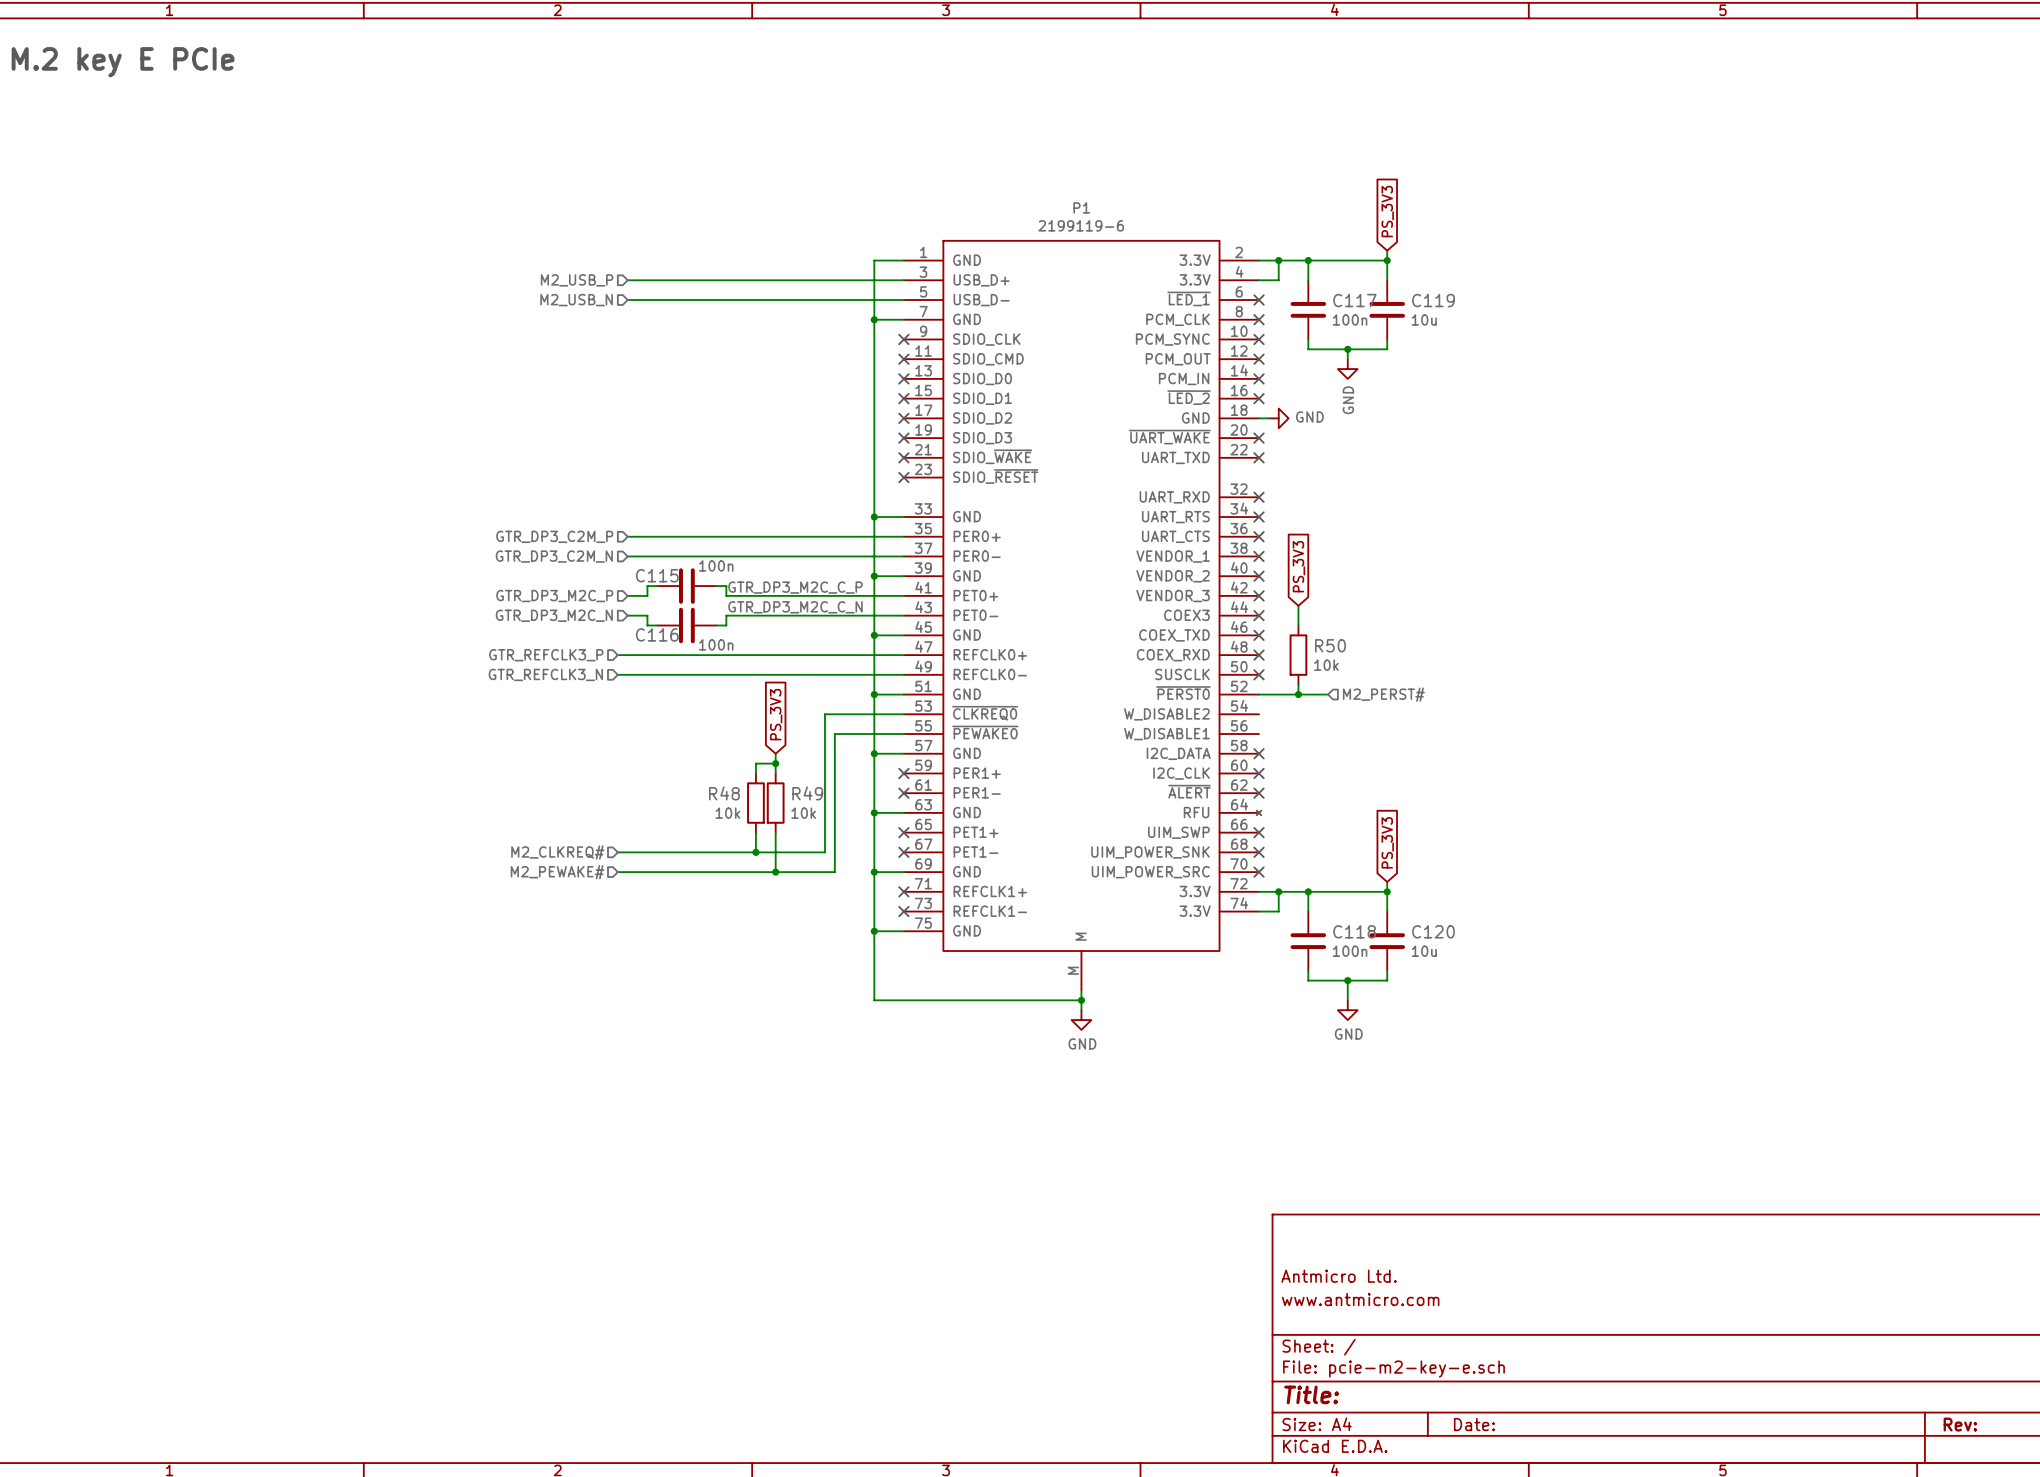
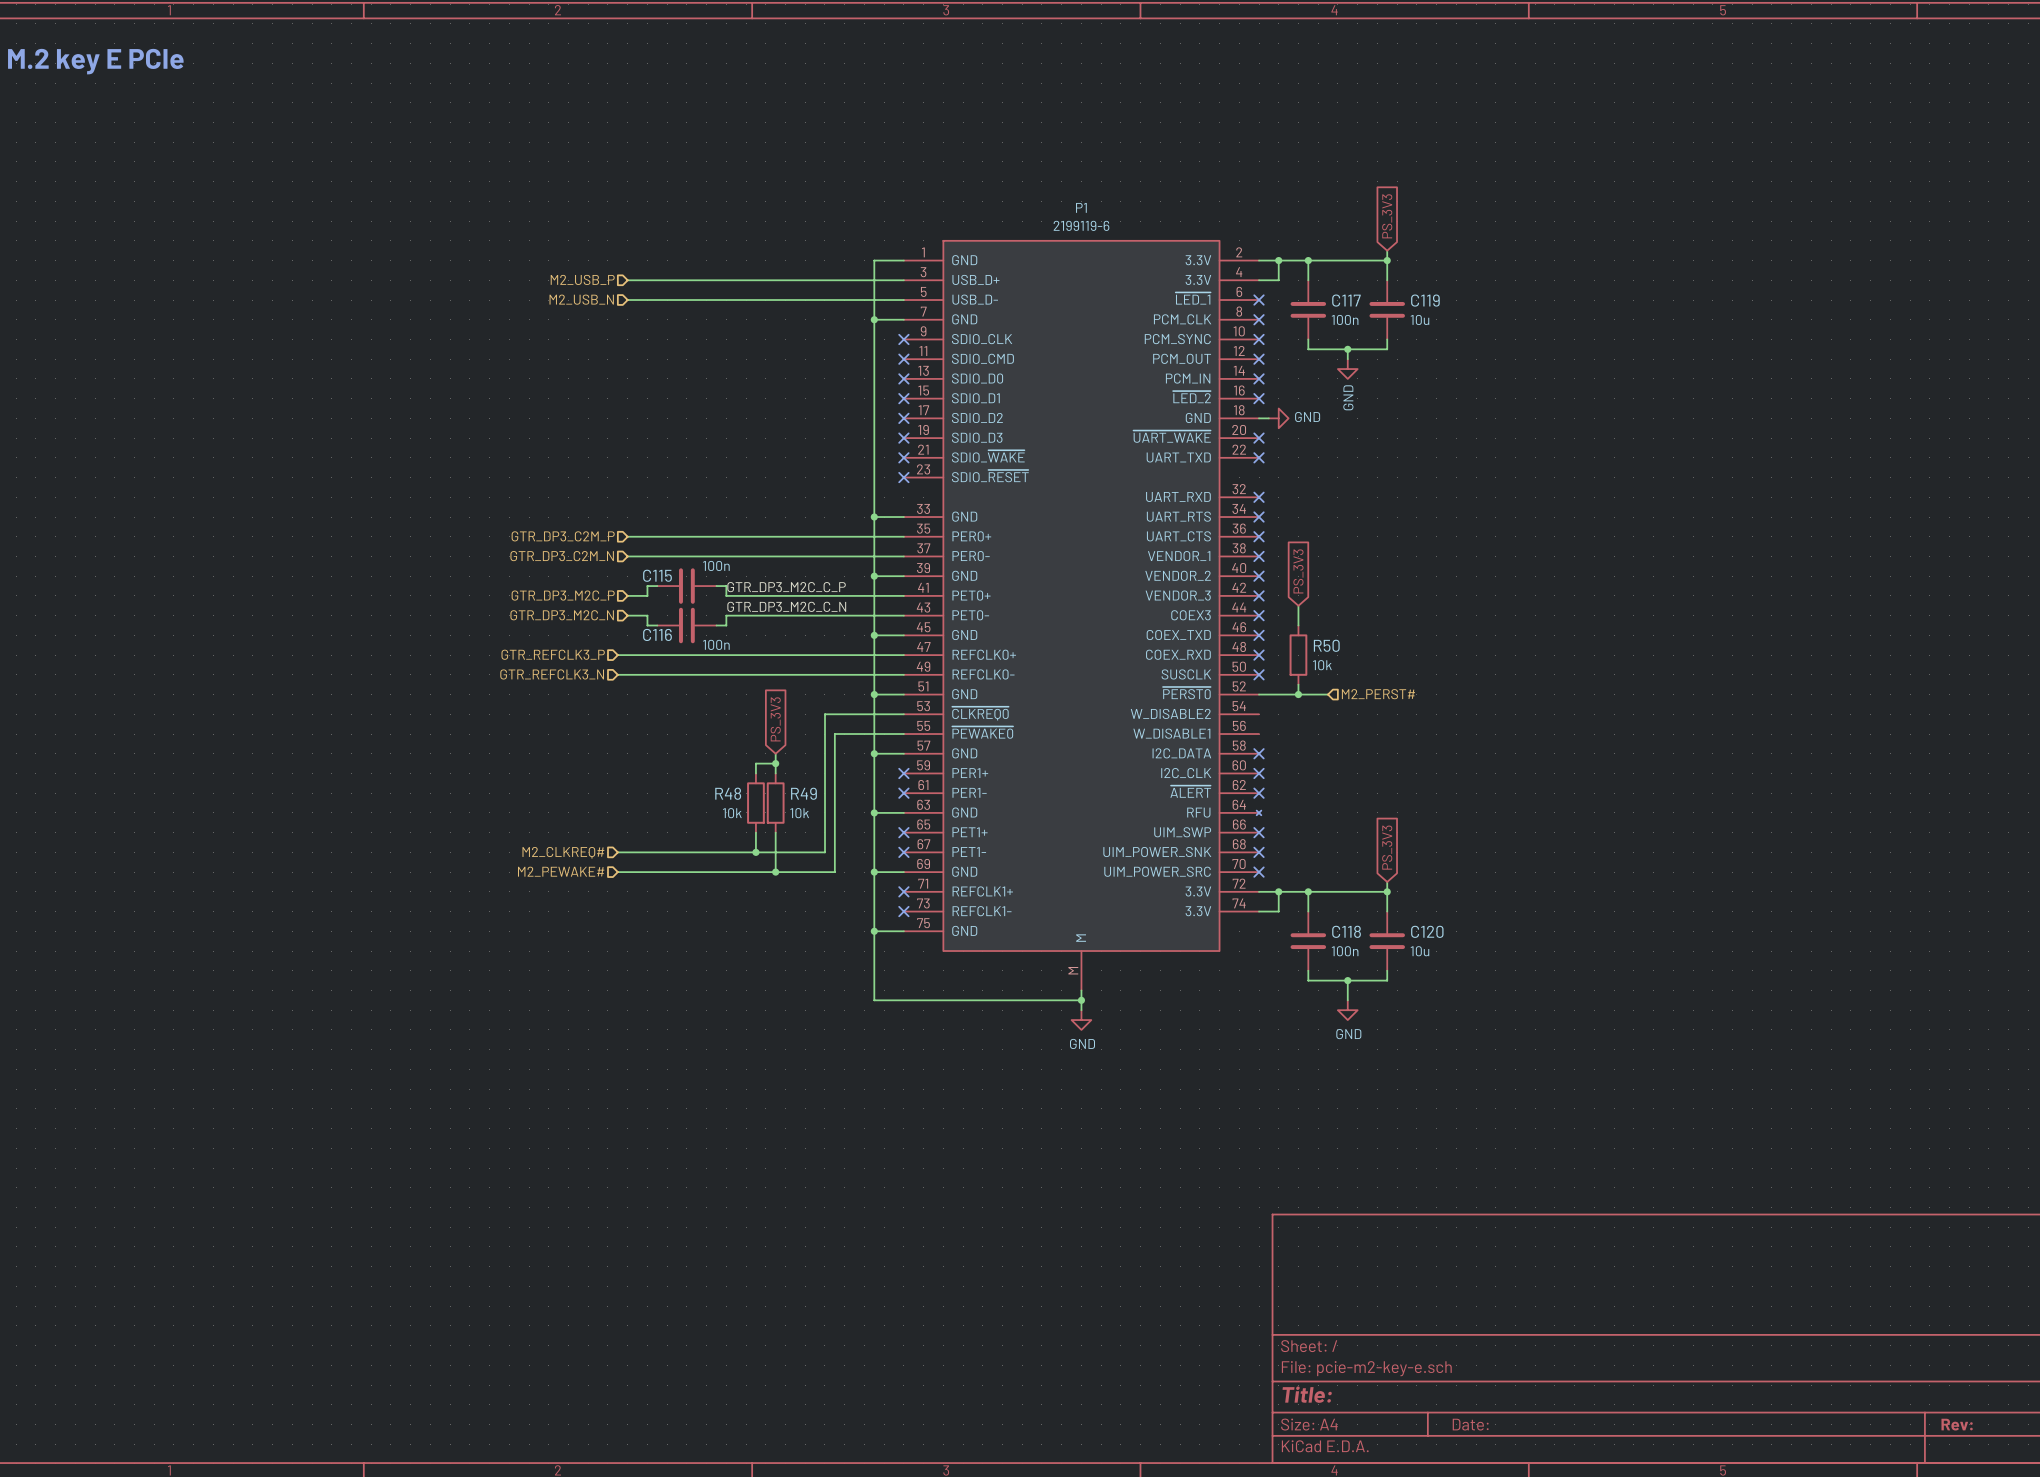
title block: Antmicro Ltd. (1339, 1276) -> none
title block: www.antmicro.com (1360, 1299) -> none

